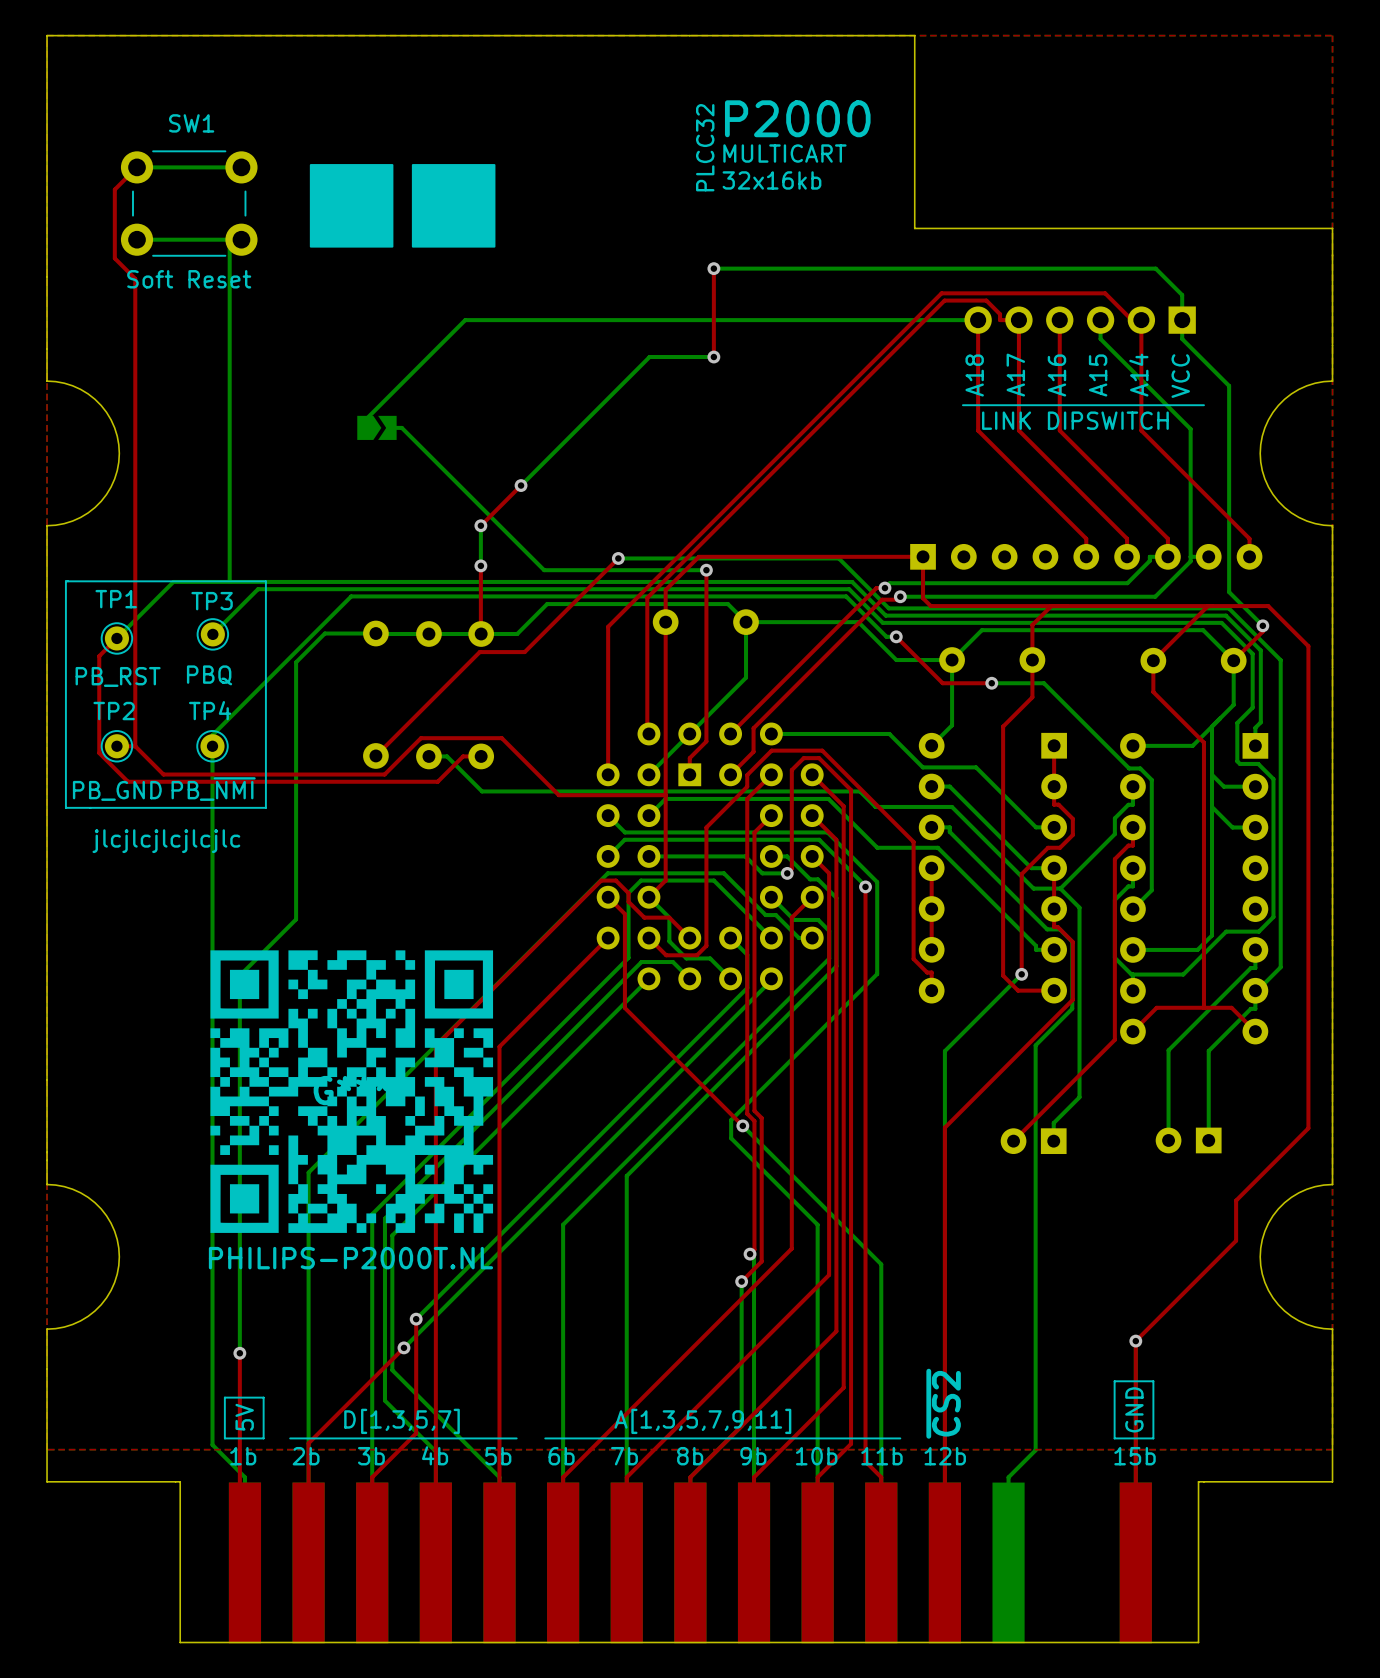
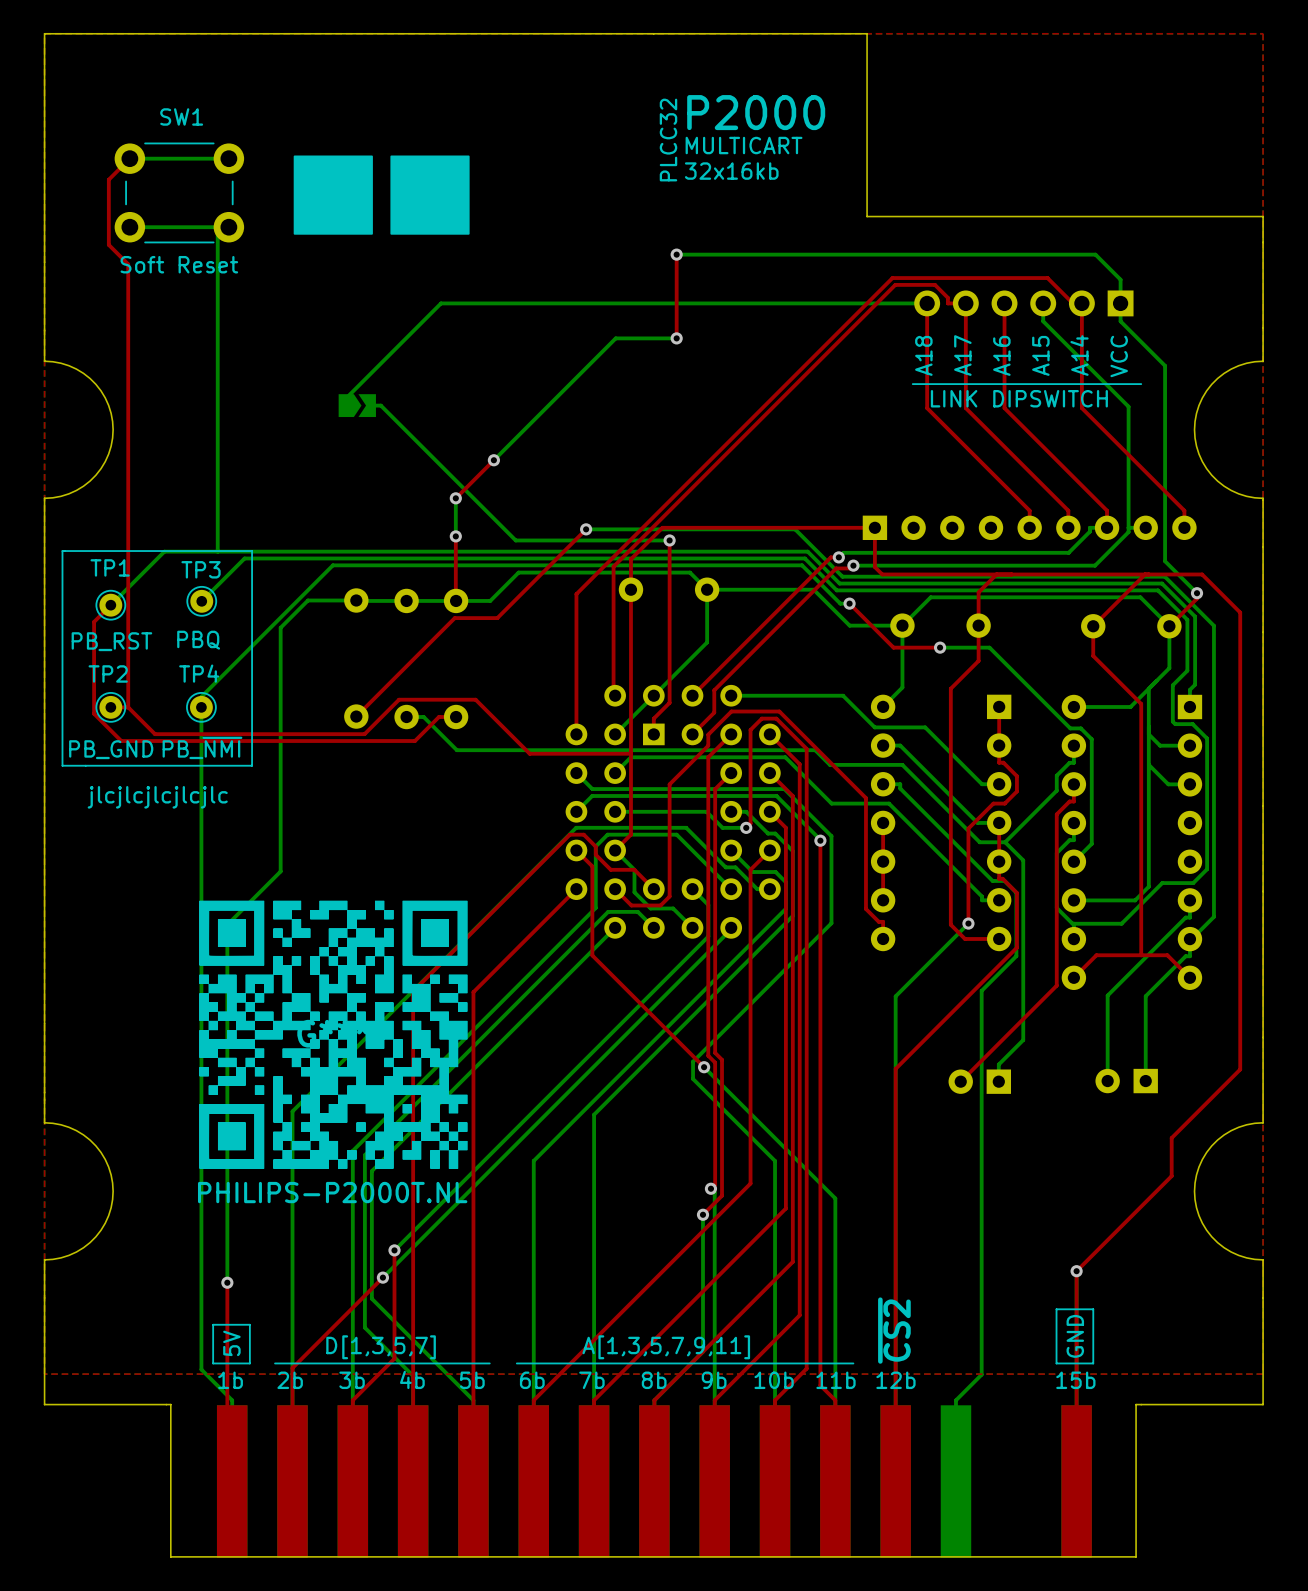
drawing: none -> [199, 900, 468, 1169]

